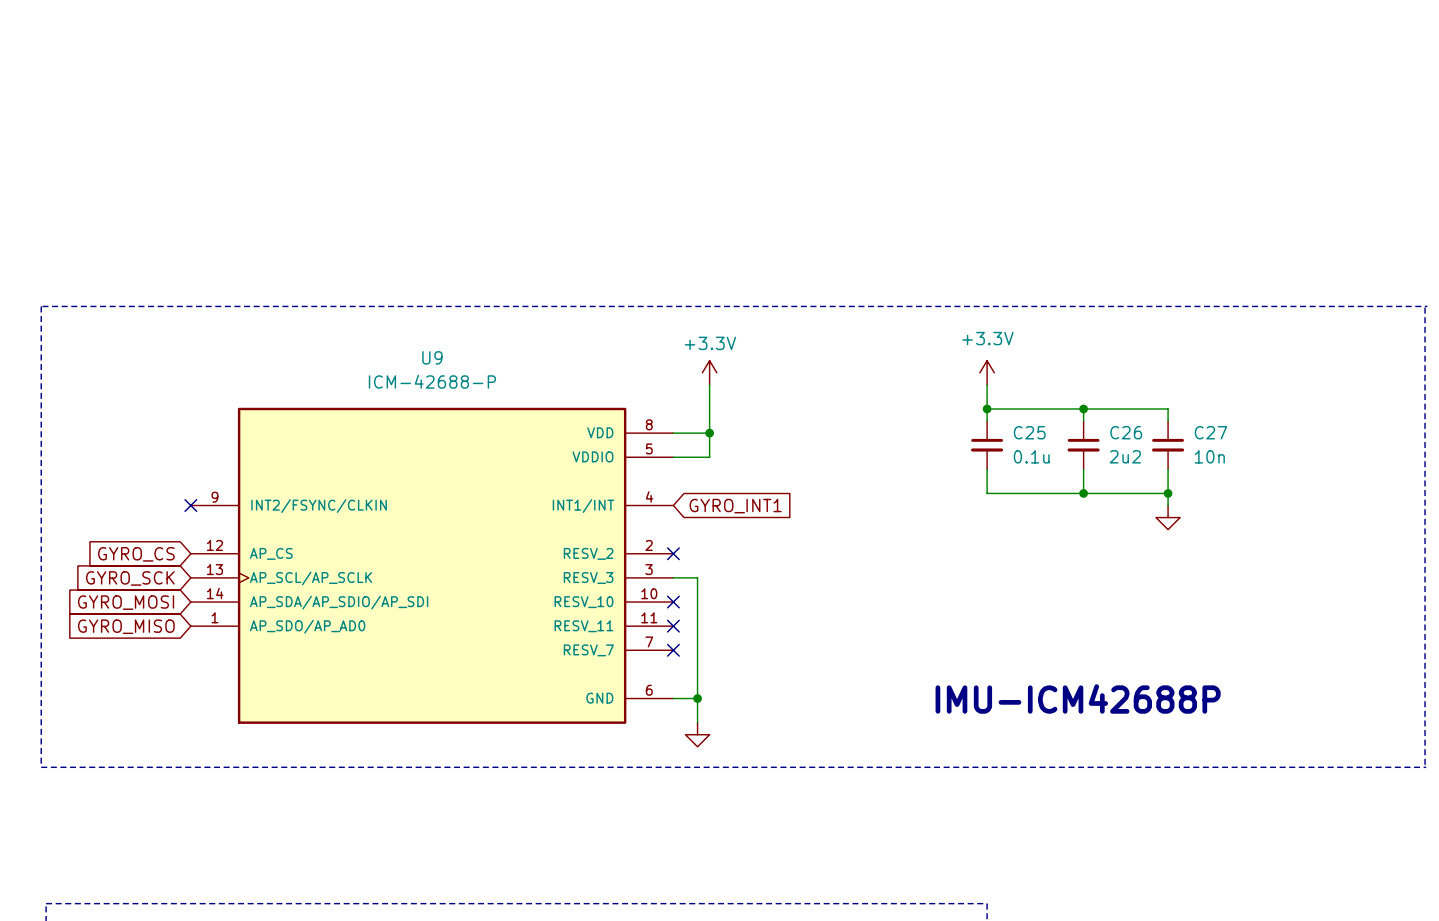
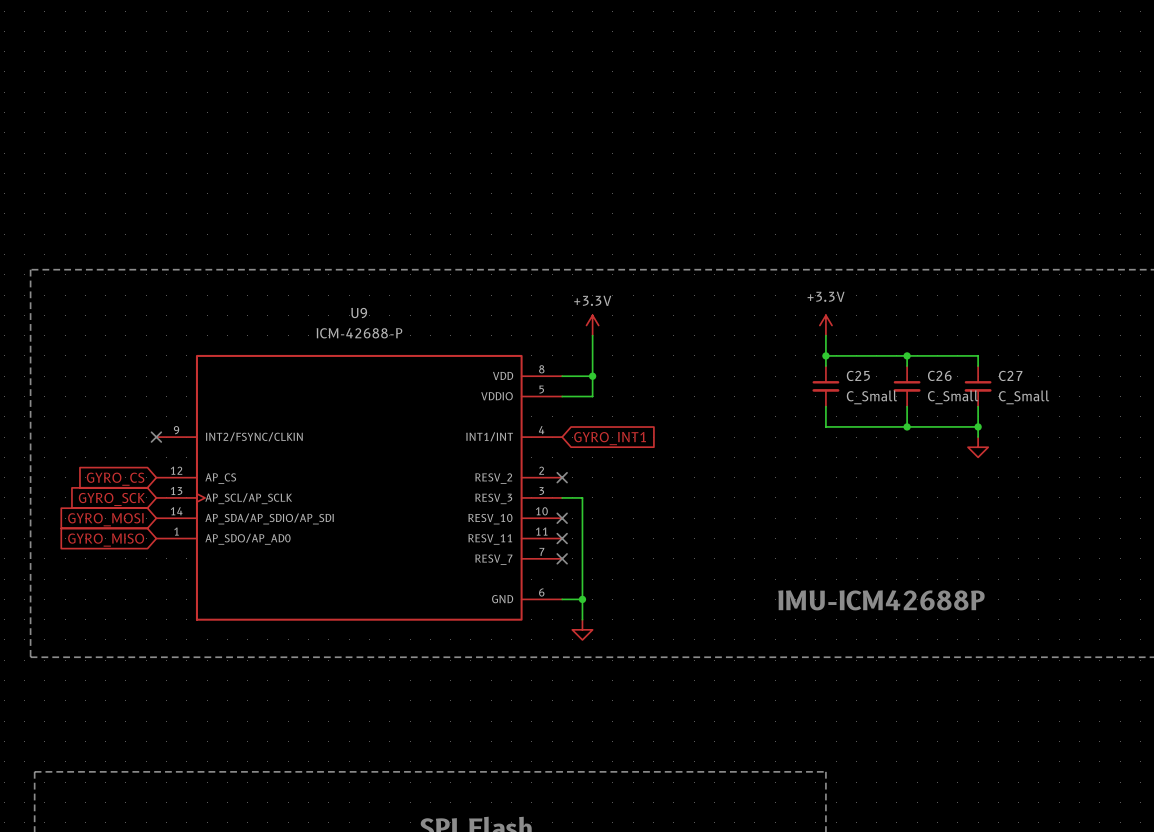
C25 value: 0.1u (1031, 456) -> C_Small (871, 397)
C26 value: 2u2 (1125, 456) -> C_Small (953, 397)
C27 value: 10n (1209, 456) -> C_Small (1024, 397)

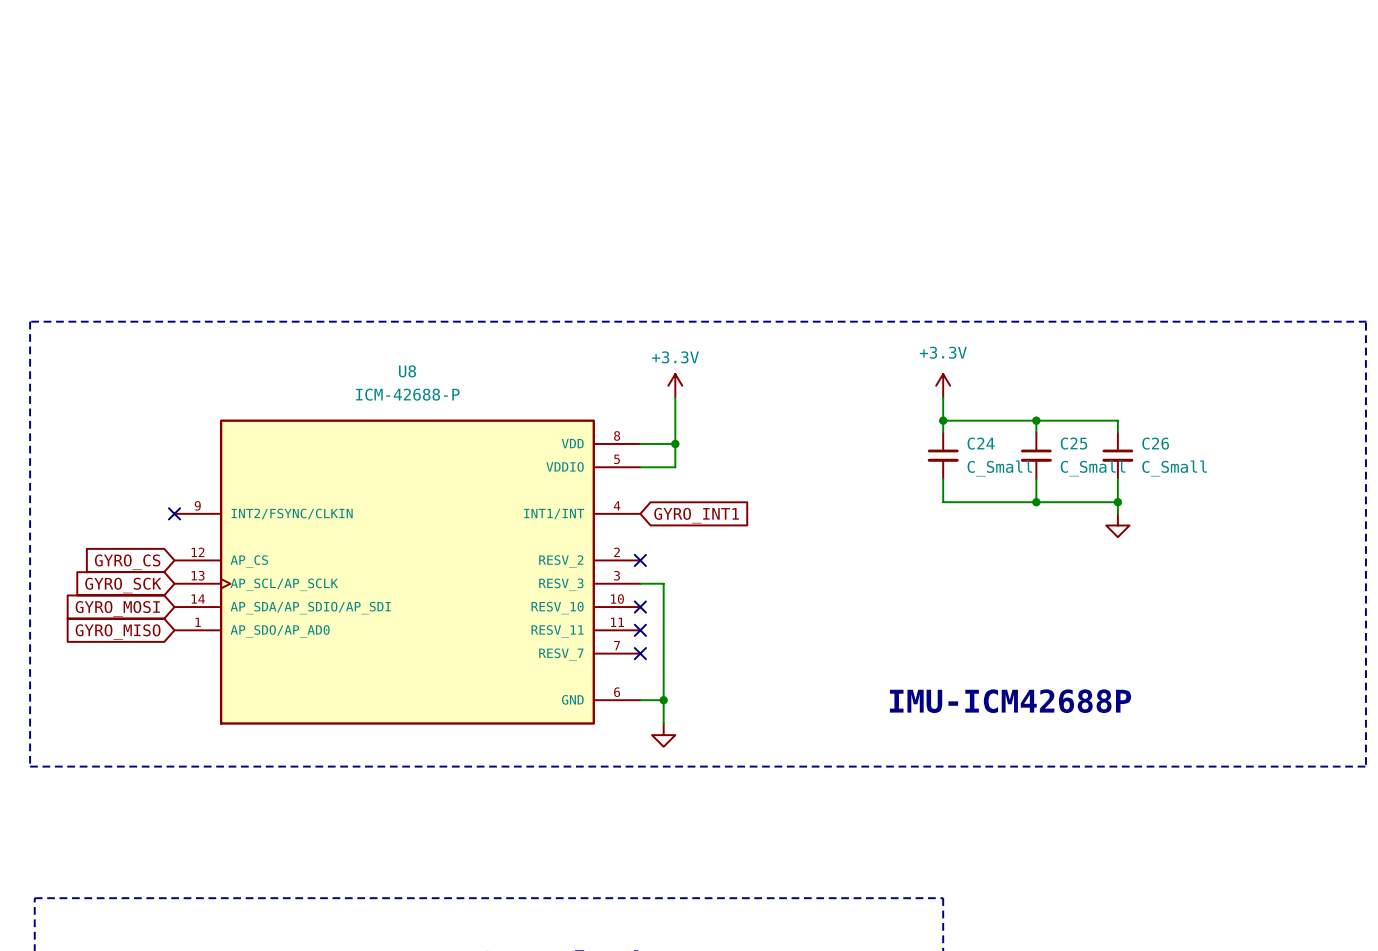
U9 name: U9 (359, 313) -> U8 (407, 371)
C25 name: C25 (858, 375) -> C24 (981, 443)
C26 name: C26 (939, 375) -> C25 (1073, 443)
C27 name: C27 (1010, 375) -> C26 (1155, 443)

